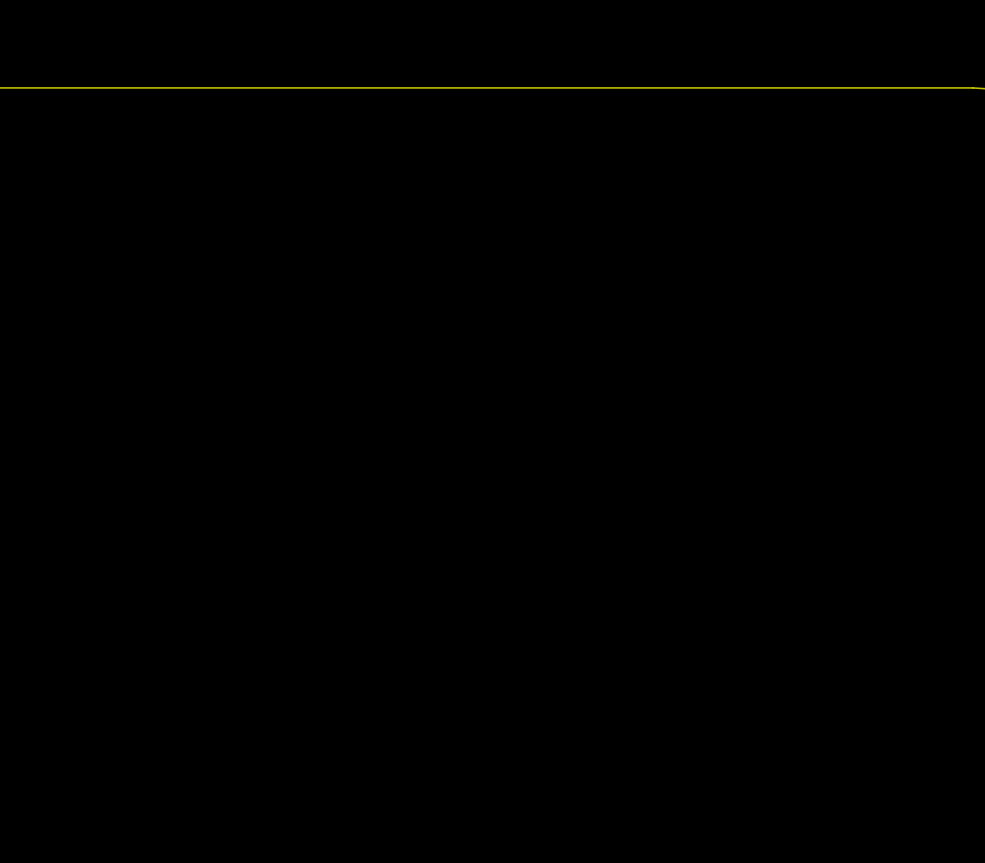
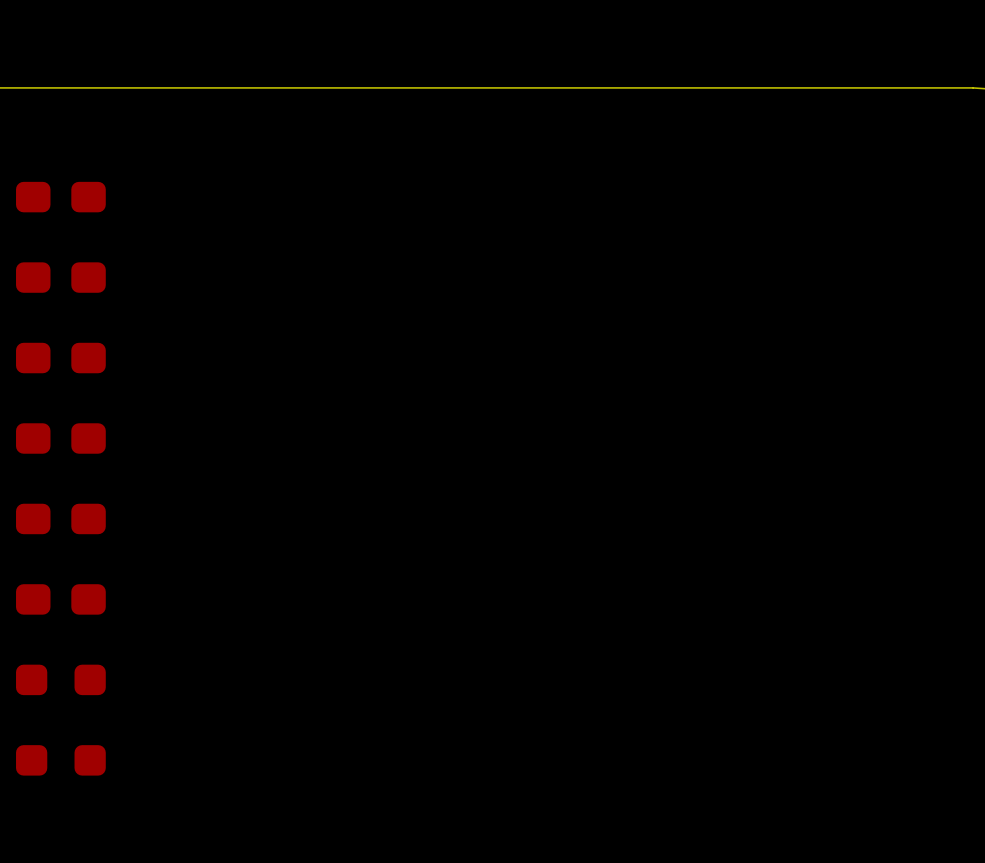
part: none -> (60, 197)
part: none -> (60, 277)
part: none -> (60, 358)
part: none -> (60, 438)
part: none -> (60, 518)
part: none -> (60, 599)
part: none -> (60, 679)
part: none -> (60, 760)

